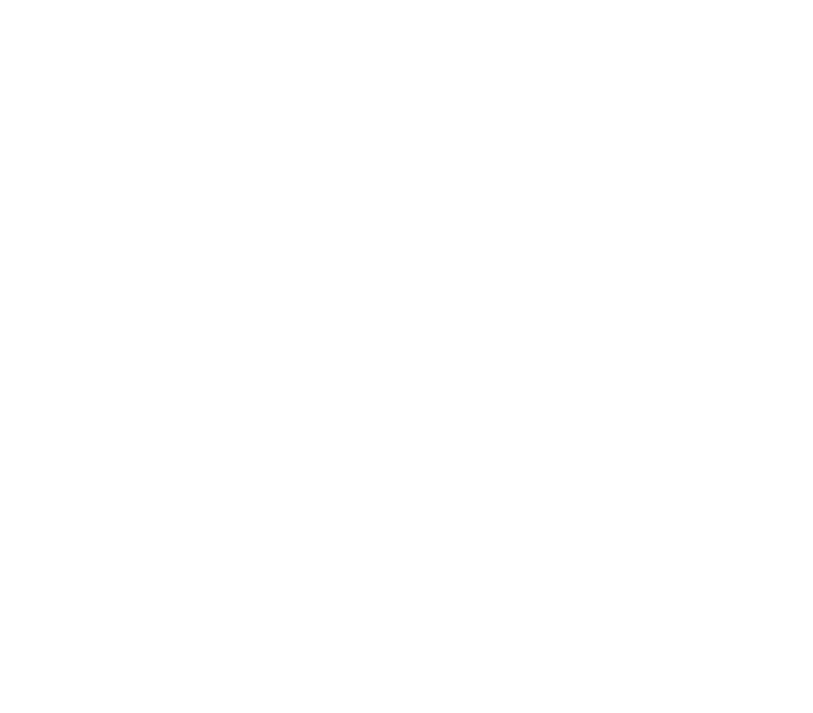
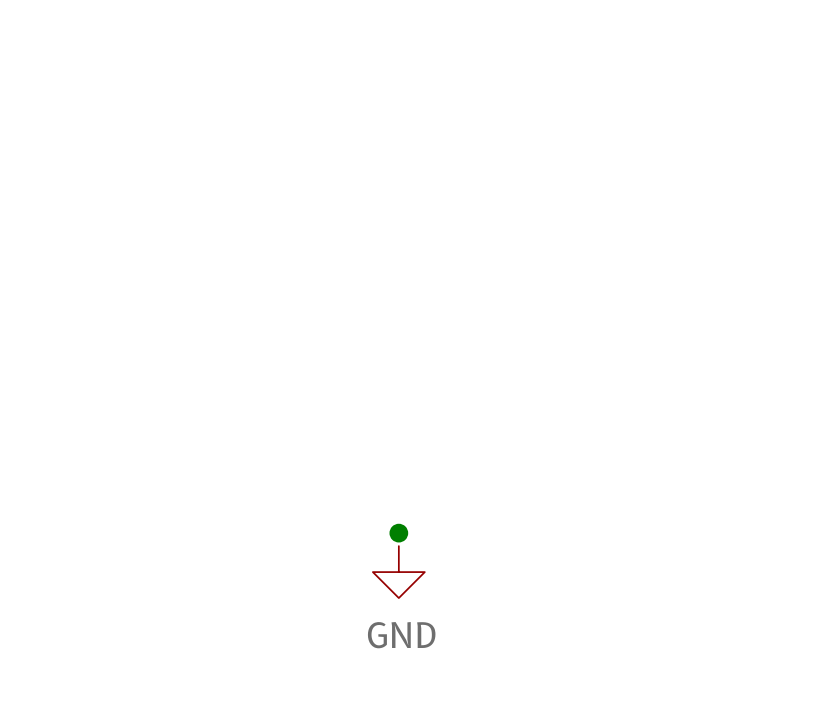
junction: none -> (398, 533)
power symbol: none -> GND (398, 572)

